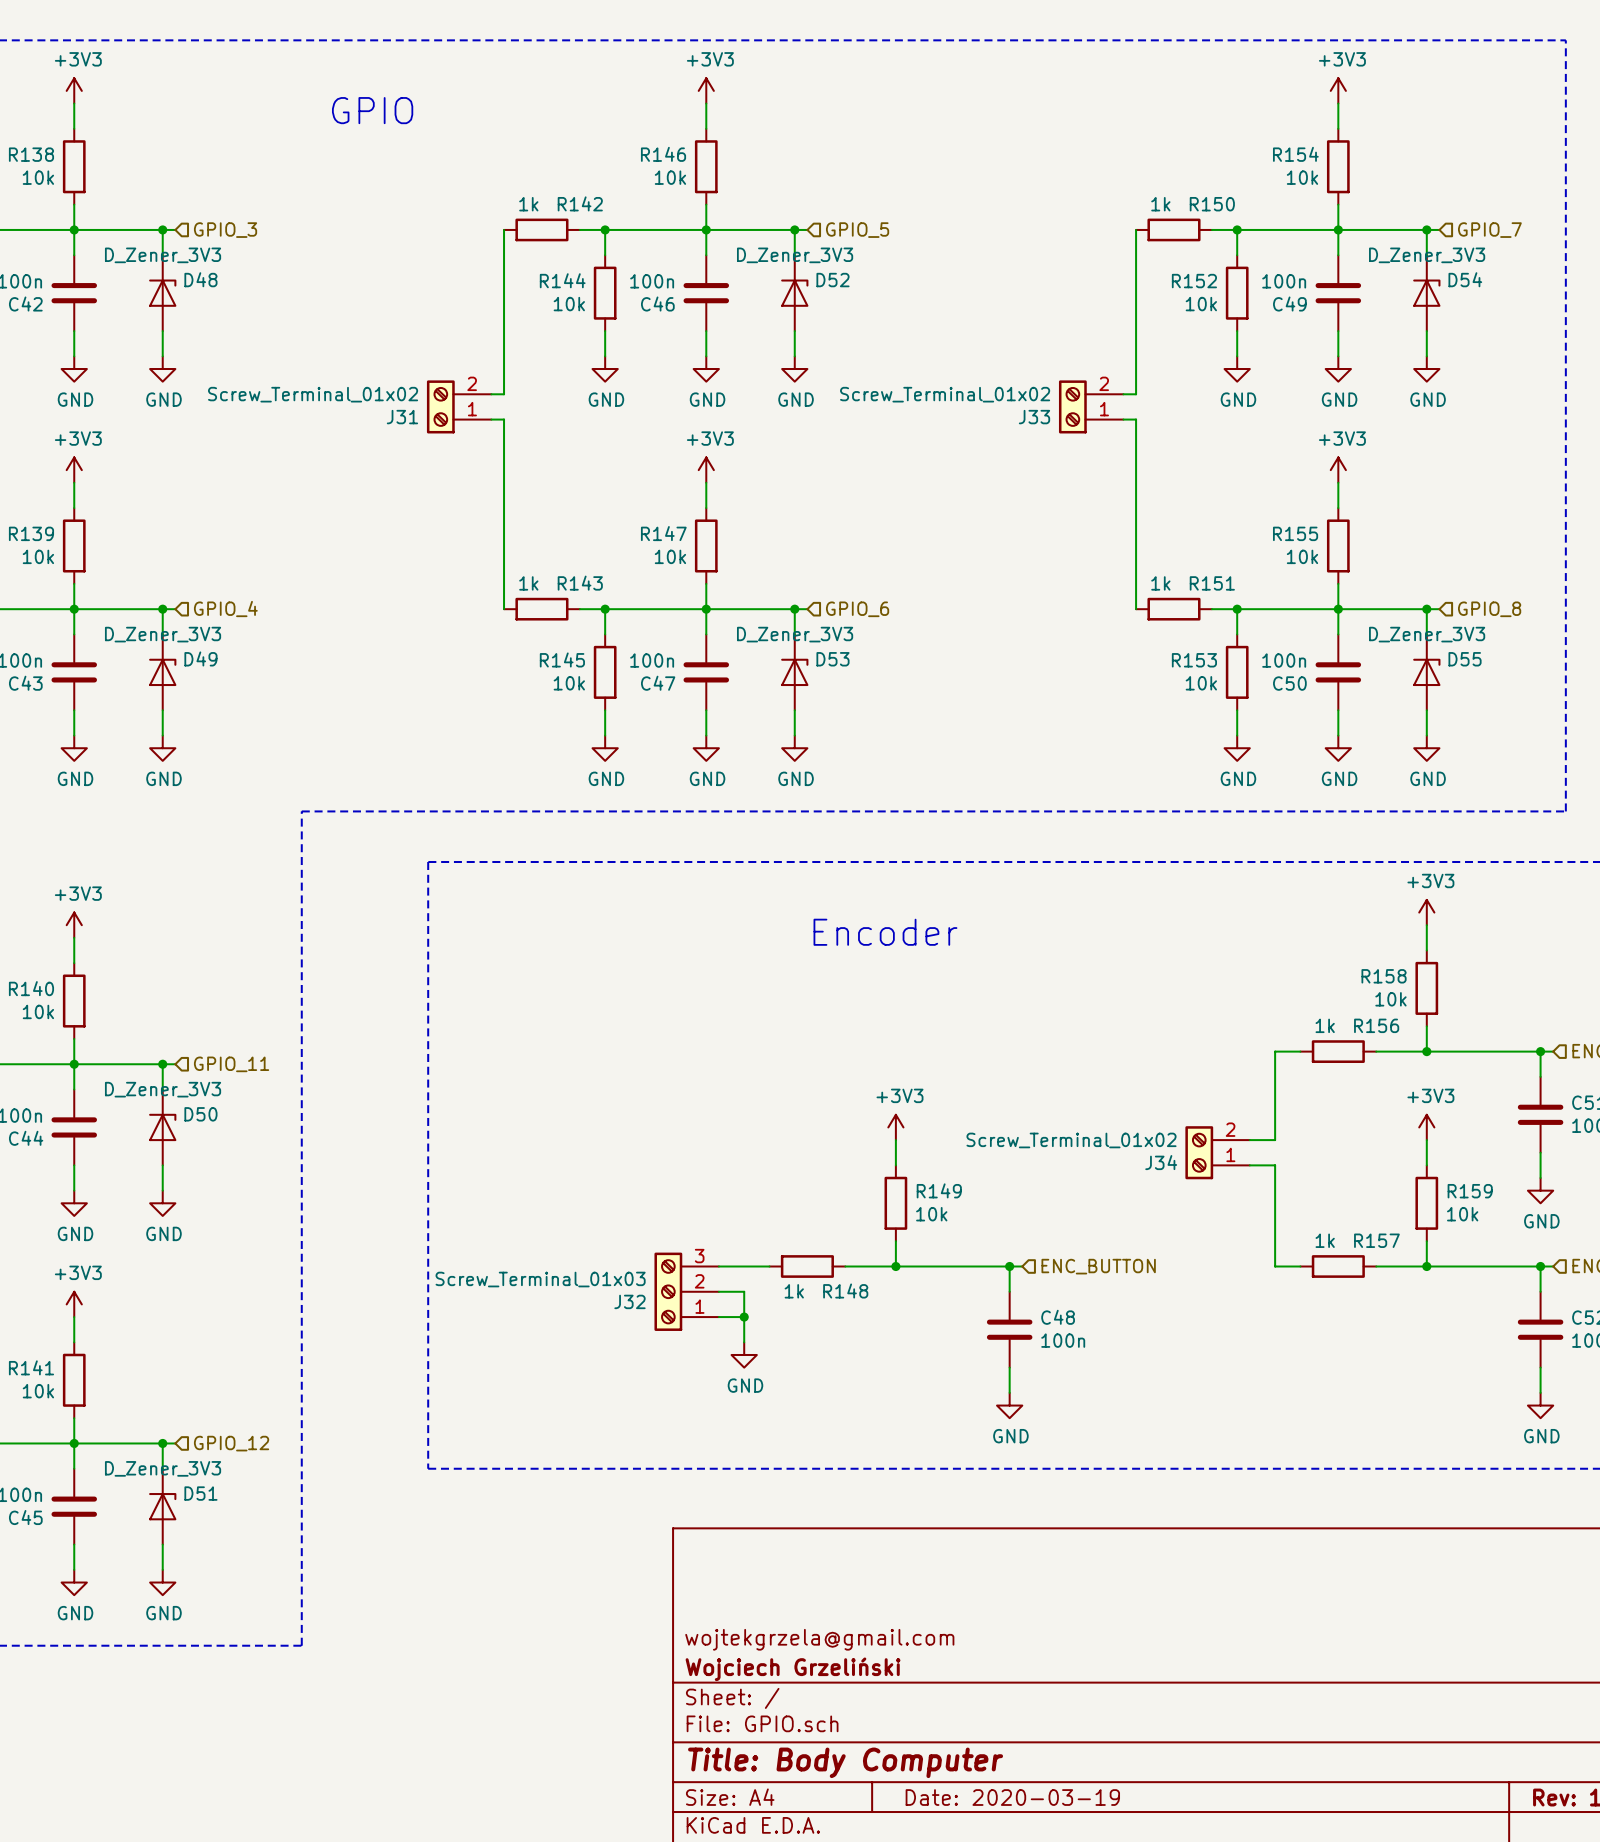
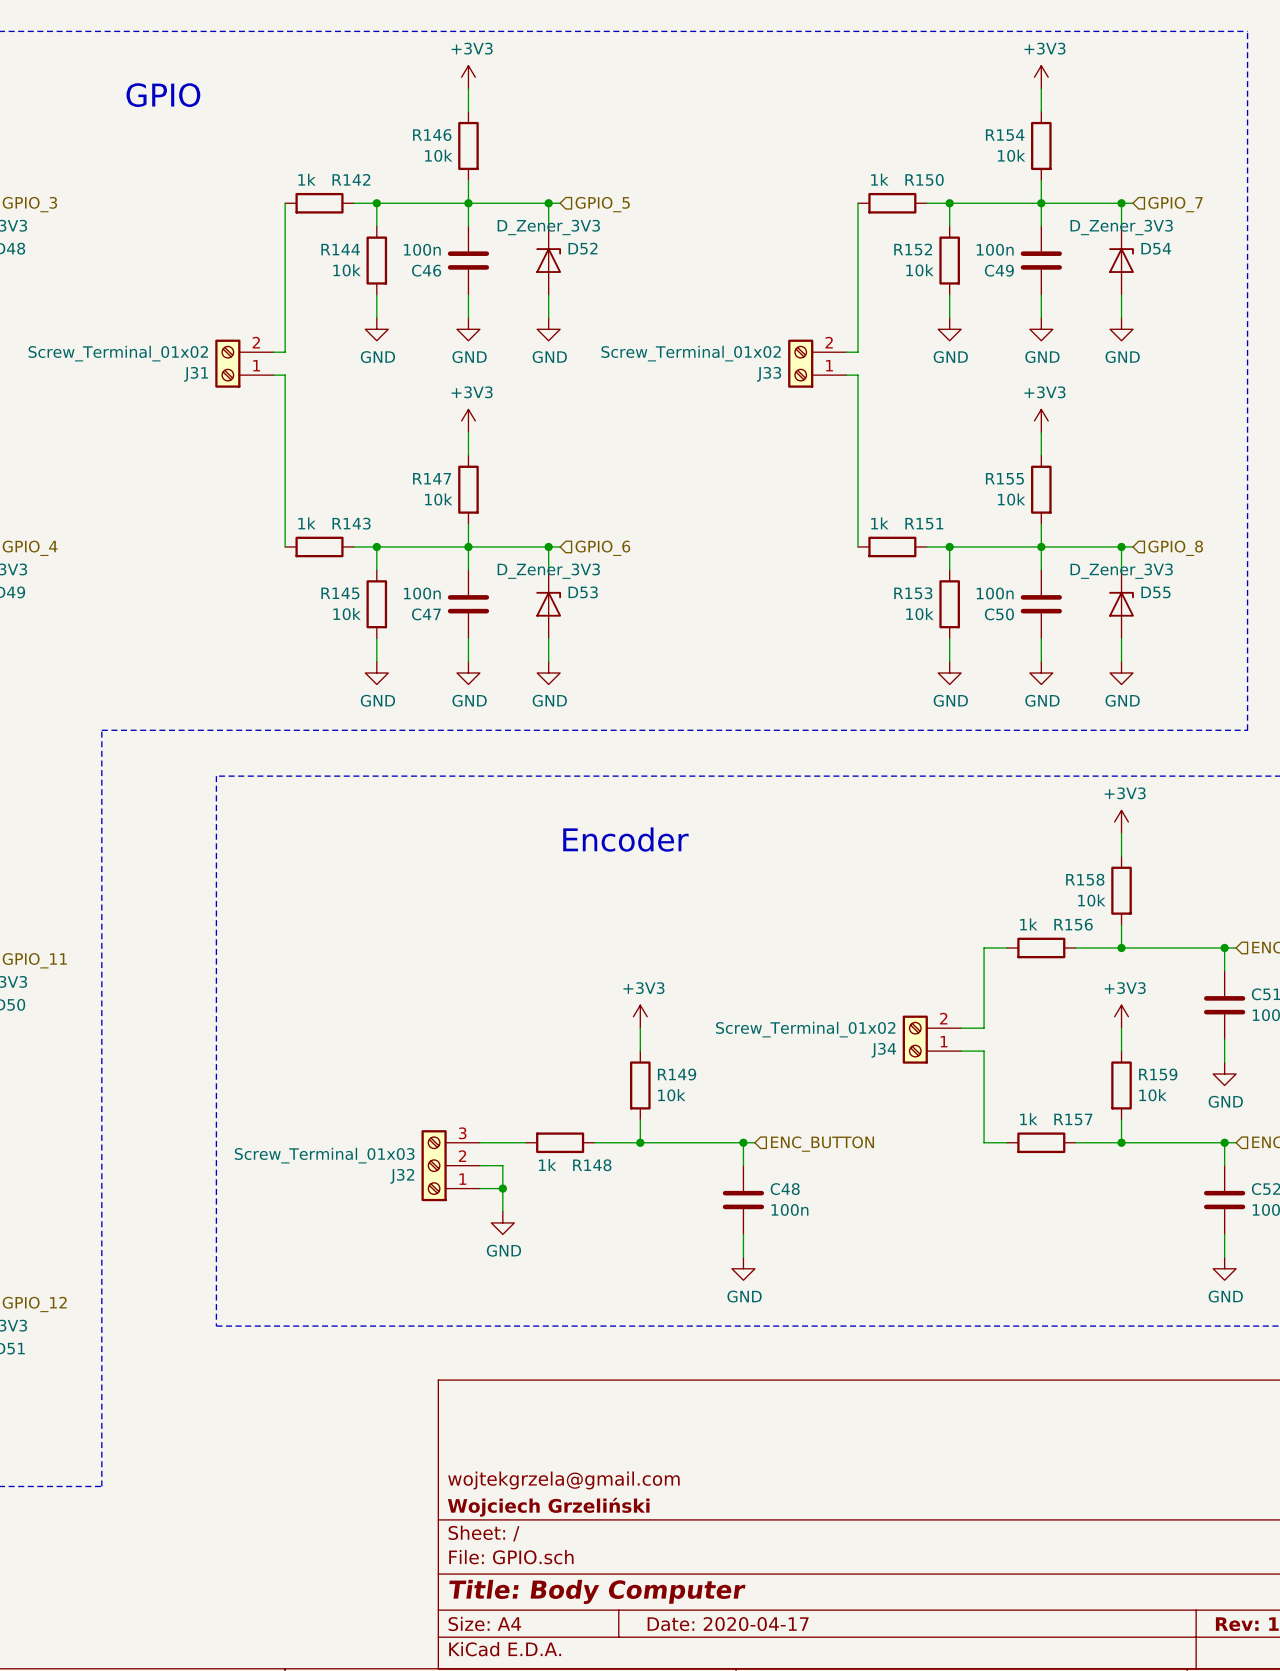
title block: Date: 2020-03-19 (1012, 1797) -> Date: 2020-04-17 (728, 1624)

